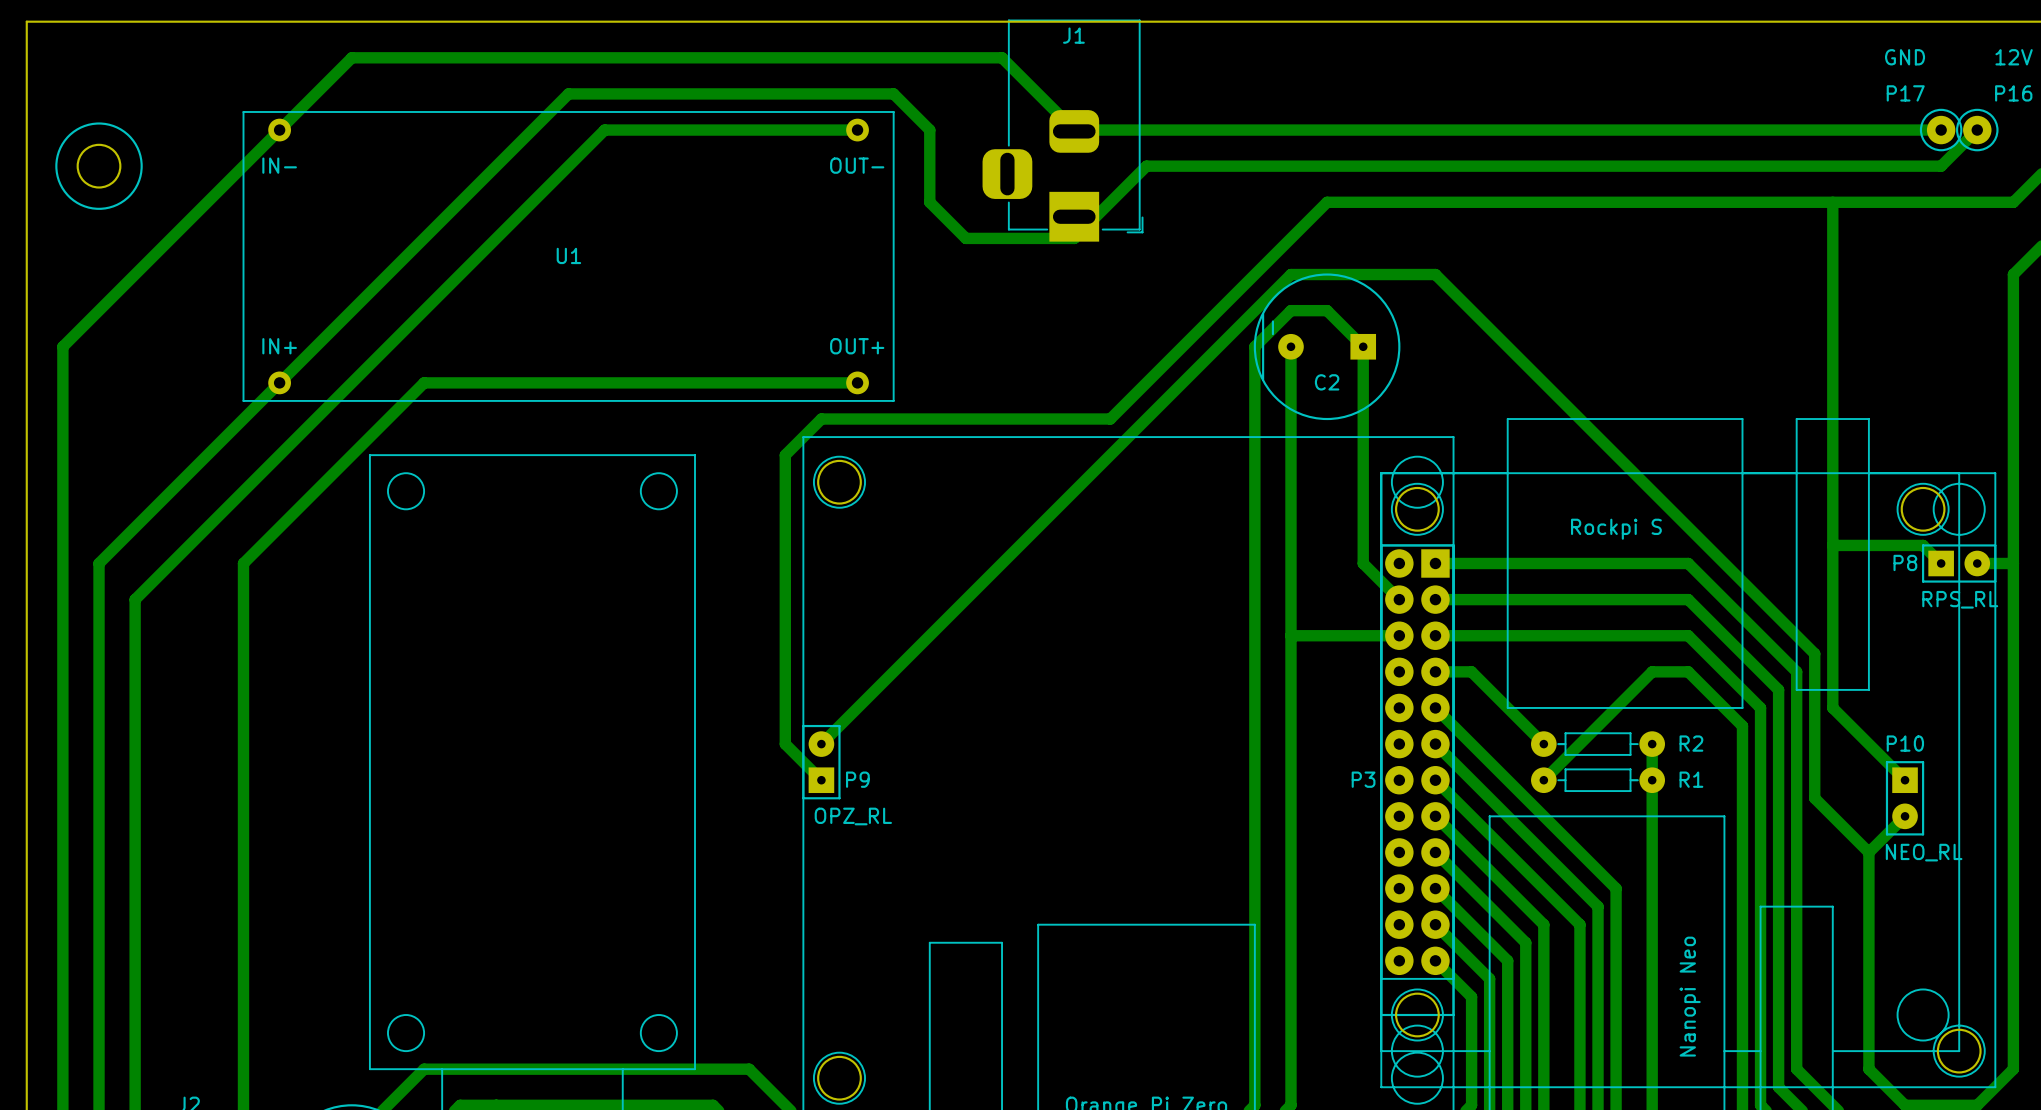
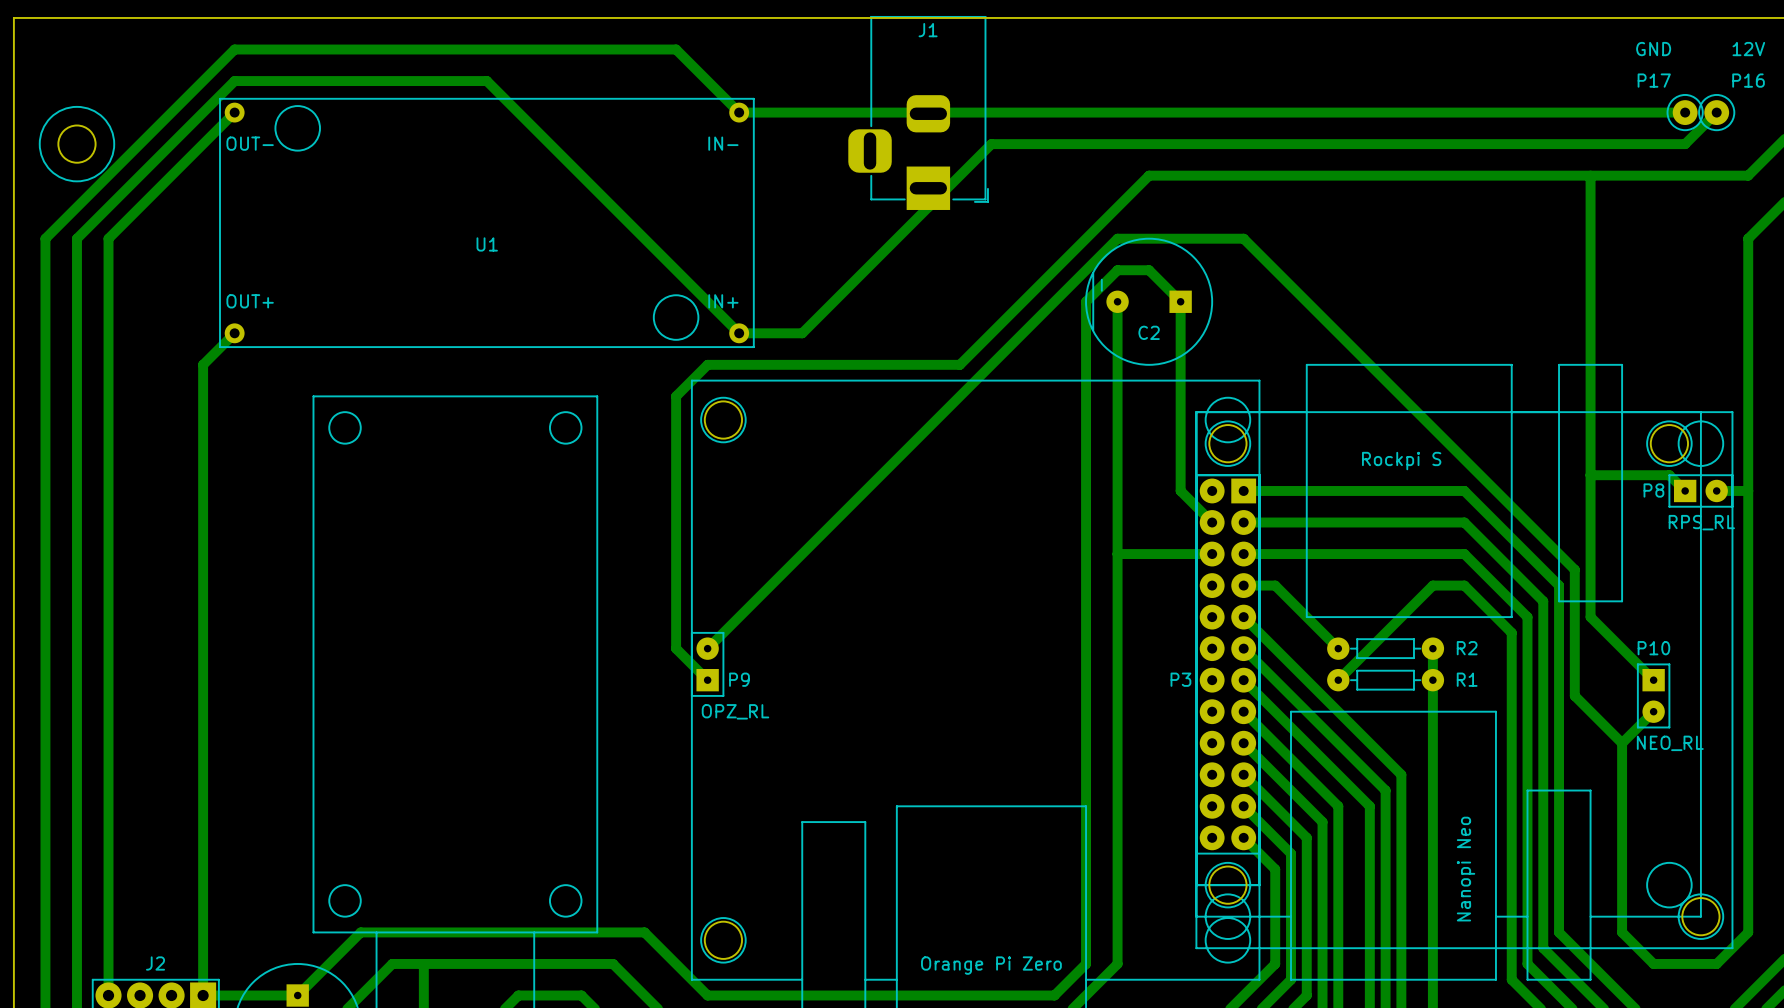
bottom track: (351, 57) (279, 130) -> (297, 49) (234, 49) (45, 238) (45, 301)
bottom track: (785, 57) (1002, 57) (1074, 130) -> (676, 49) (739, 112) (928, 113)
U1 footprint: [242, 111, 895, 402] -> [219, 98, 755, 348]
bottom track: (857, 130) (604, 130) (135, 599) -> none
bottom track: (1074, 238) (965, 238) (929, 202) (929, 130) (893, 93) (568, 93) (279, 382) -> (928, 207) (802, 333) (739, 333) (486, 81) (234, 81) (76, 238) (76, 490)
bottom track: (135, 274) (62, 346) -> (108, 238) (108, 522)
bottom track: (857, 382) (424, 382) (243, 563) -> none
bottom track: (243, 419) (99, 563) -> (203, 364) (203, 490)

